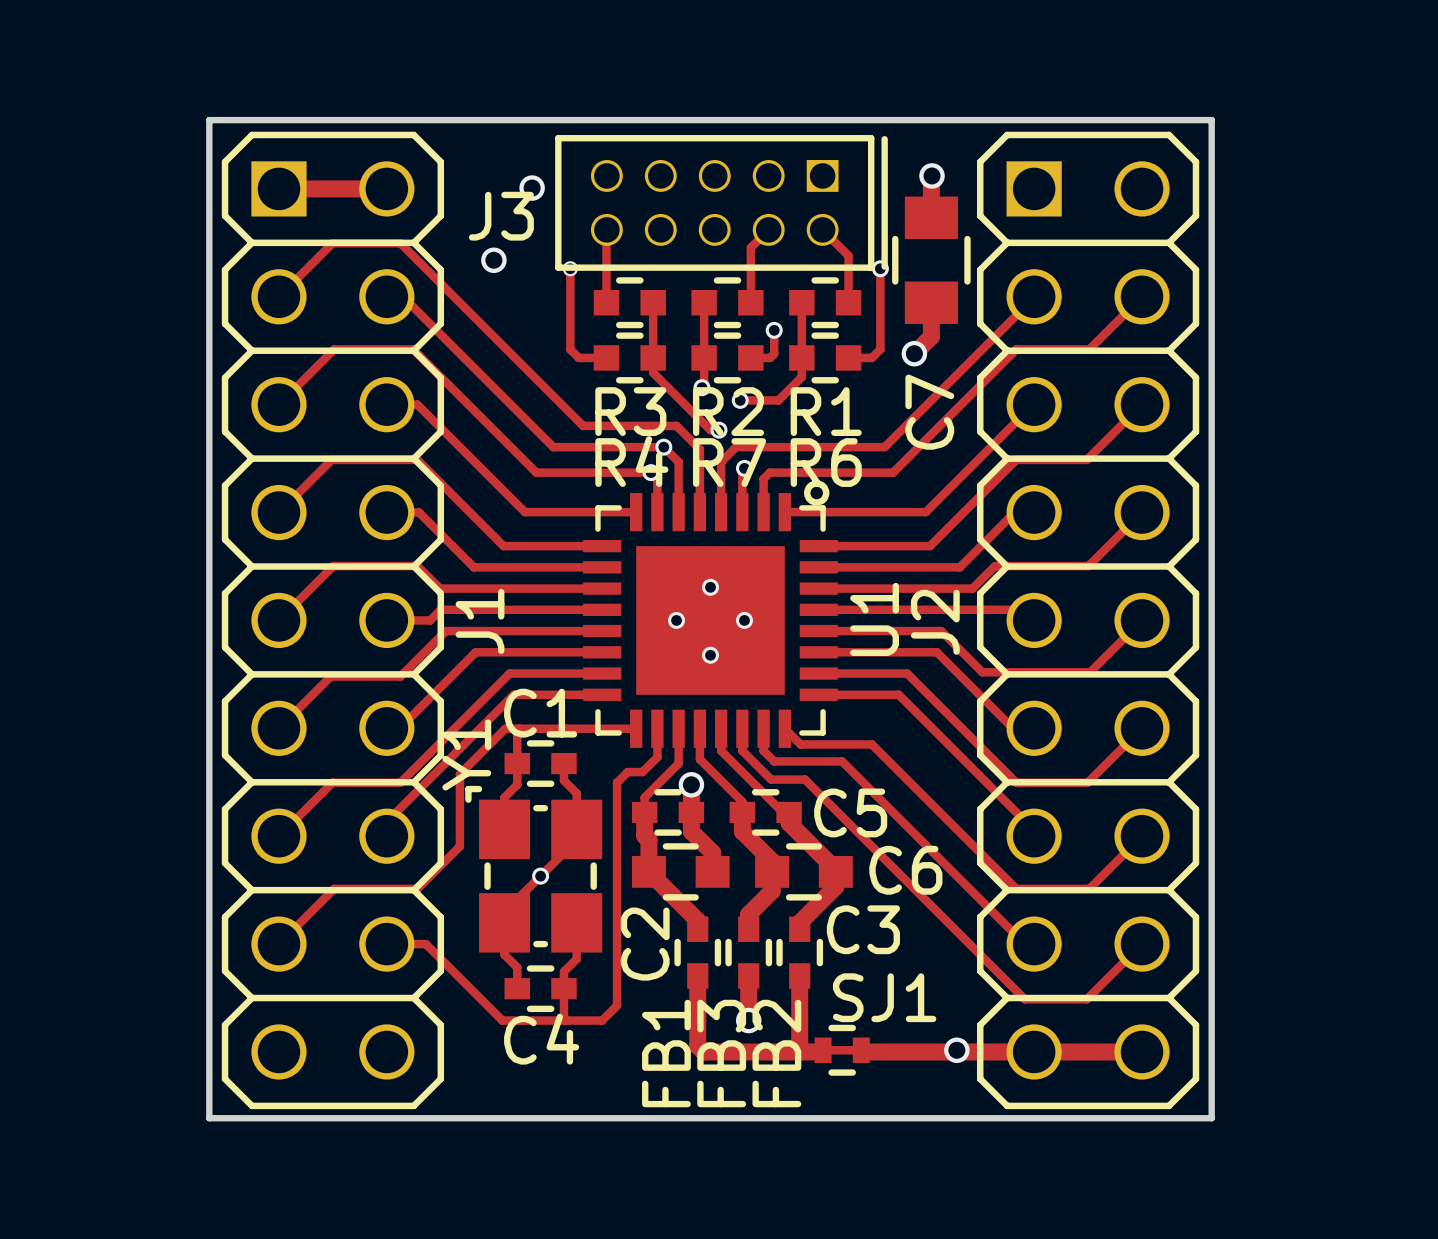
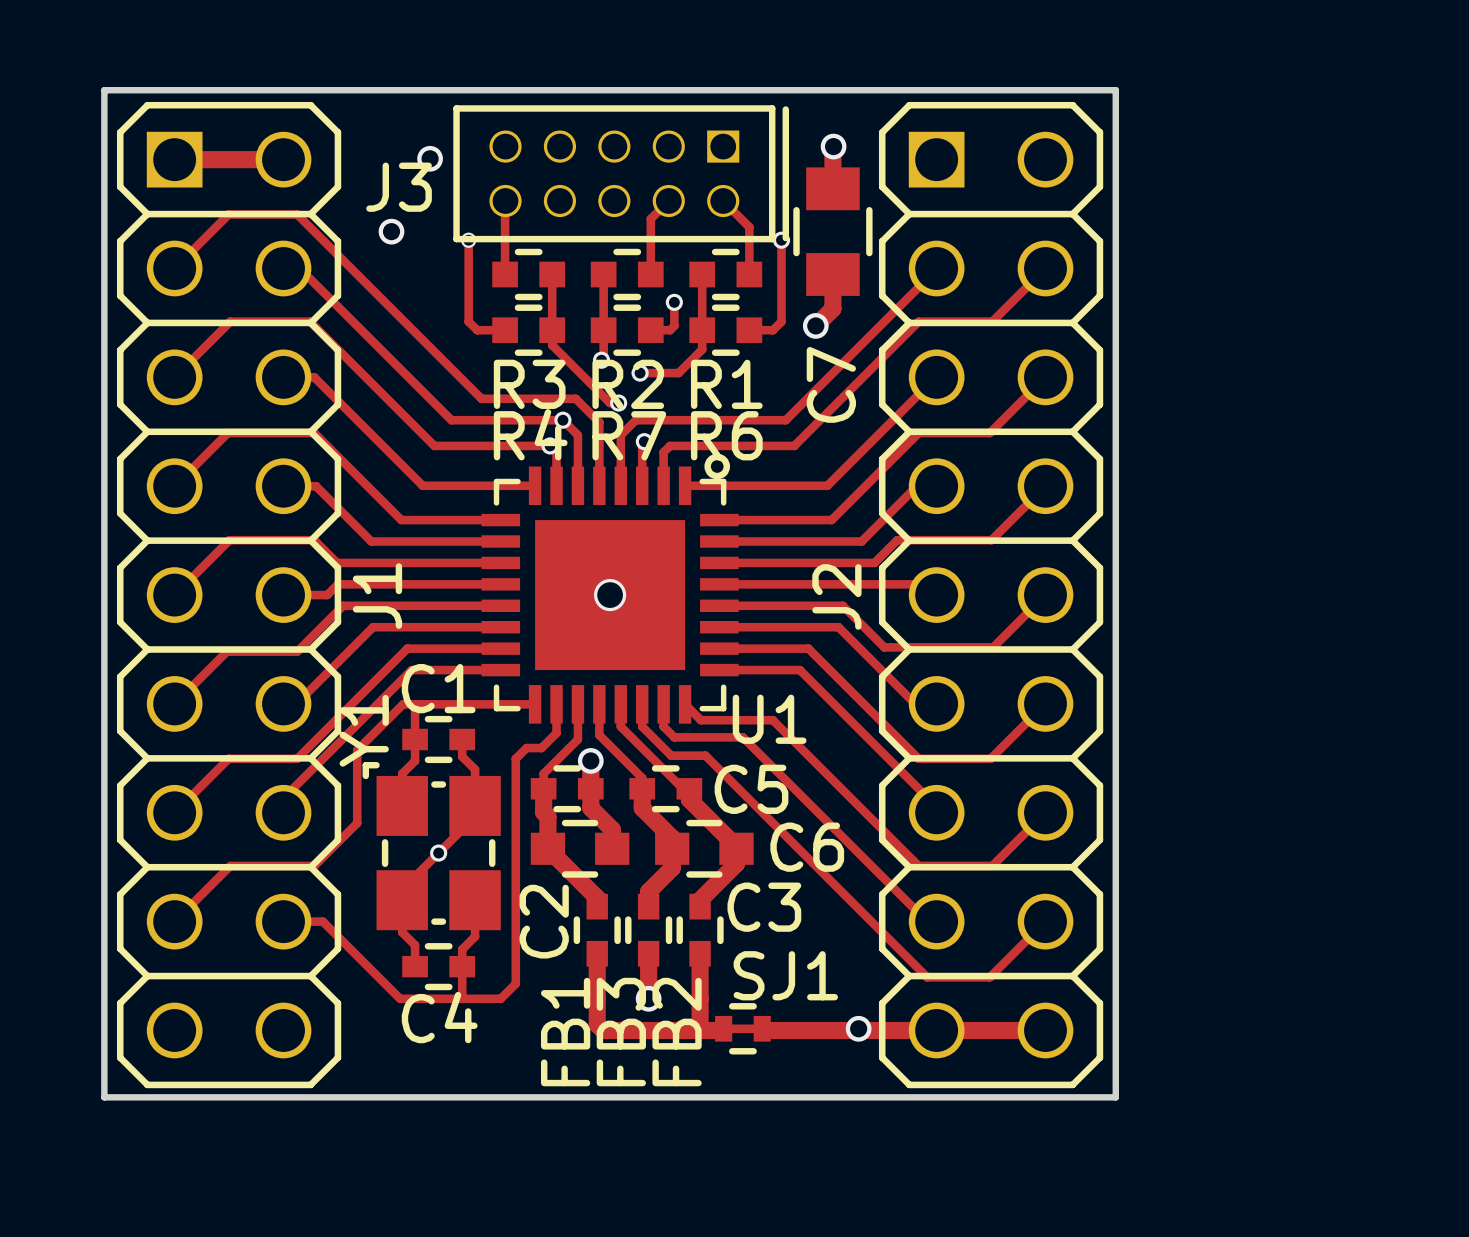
U1 footprint: [583, 480, 838, 748] -> [481, 453, 739, 724]
via: (710, 587) -> none
U1 name position: U1 (874, 619) -> U1 (769, 719)
via: (676, 620) -> none
via: none -> (610, 595)
via: (744, 620) -> none
via: (710, 655) -> none

